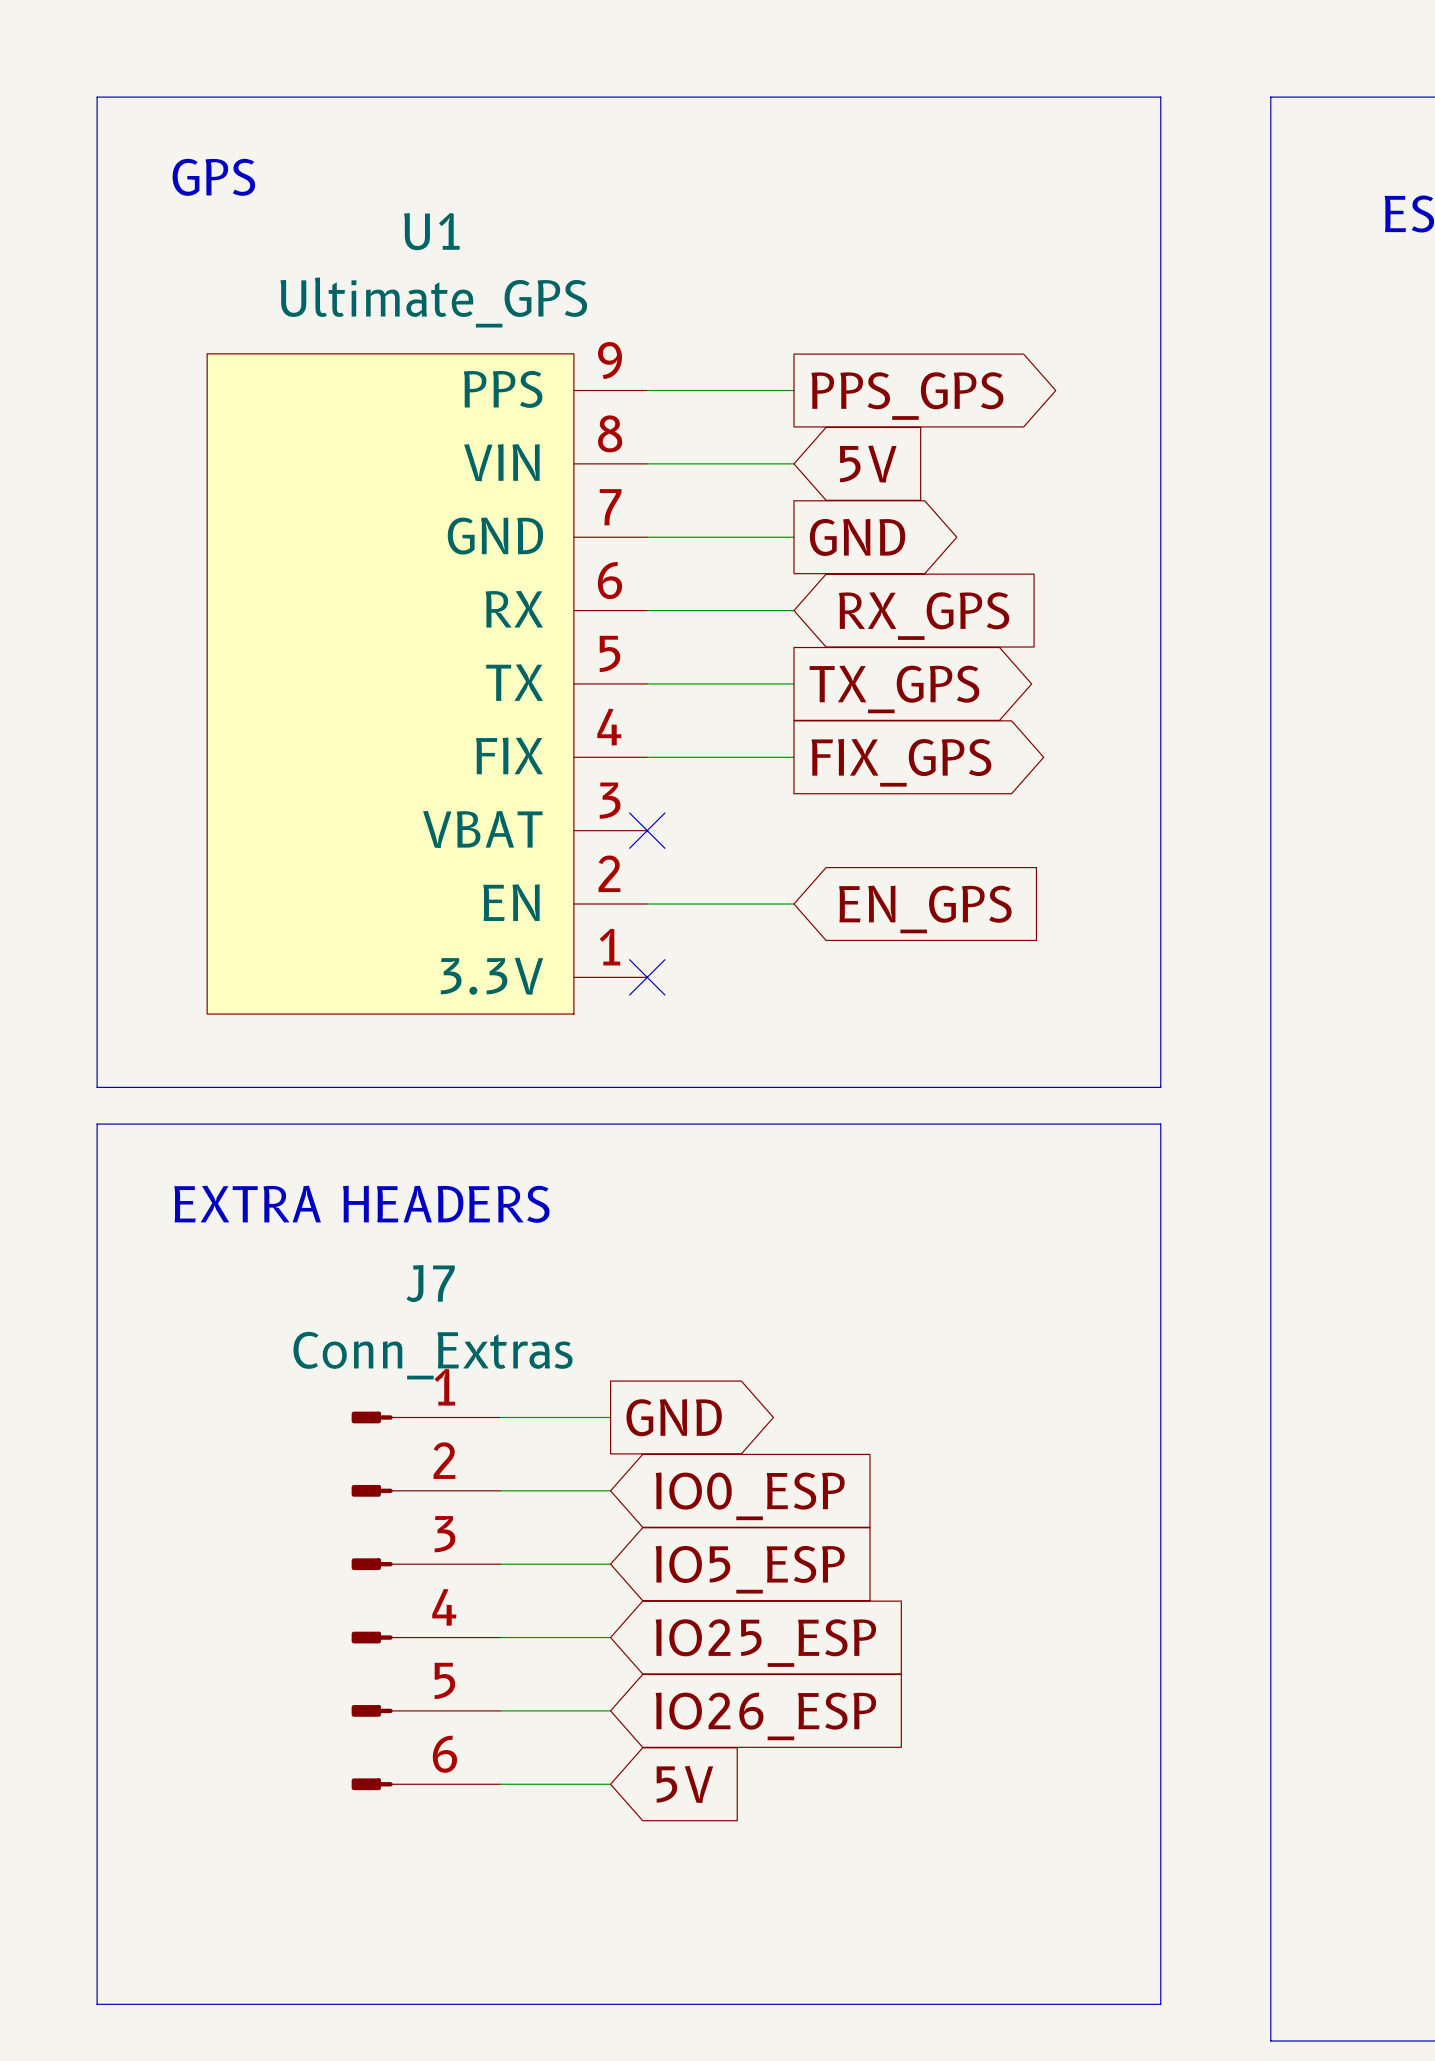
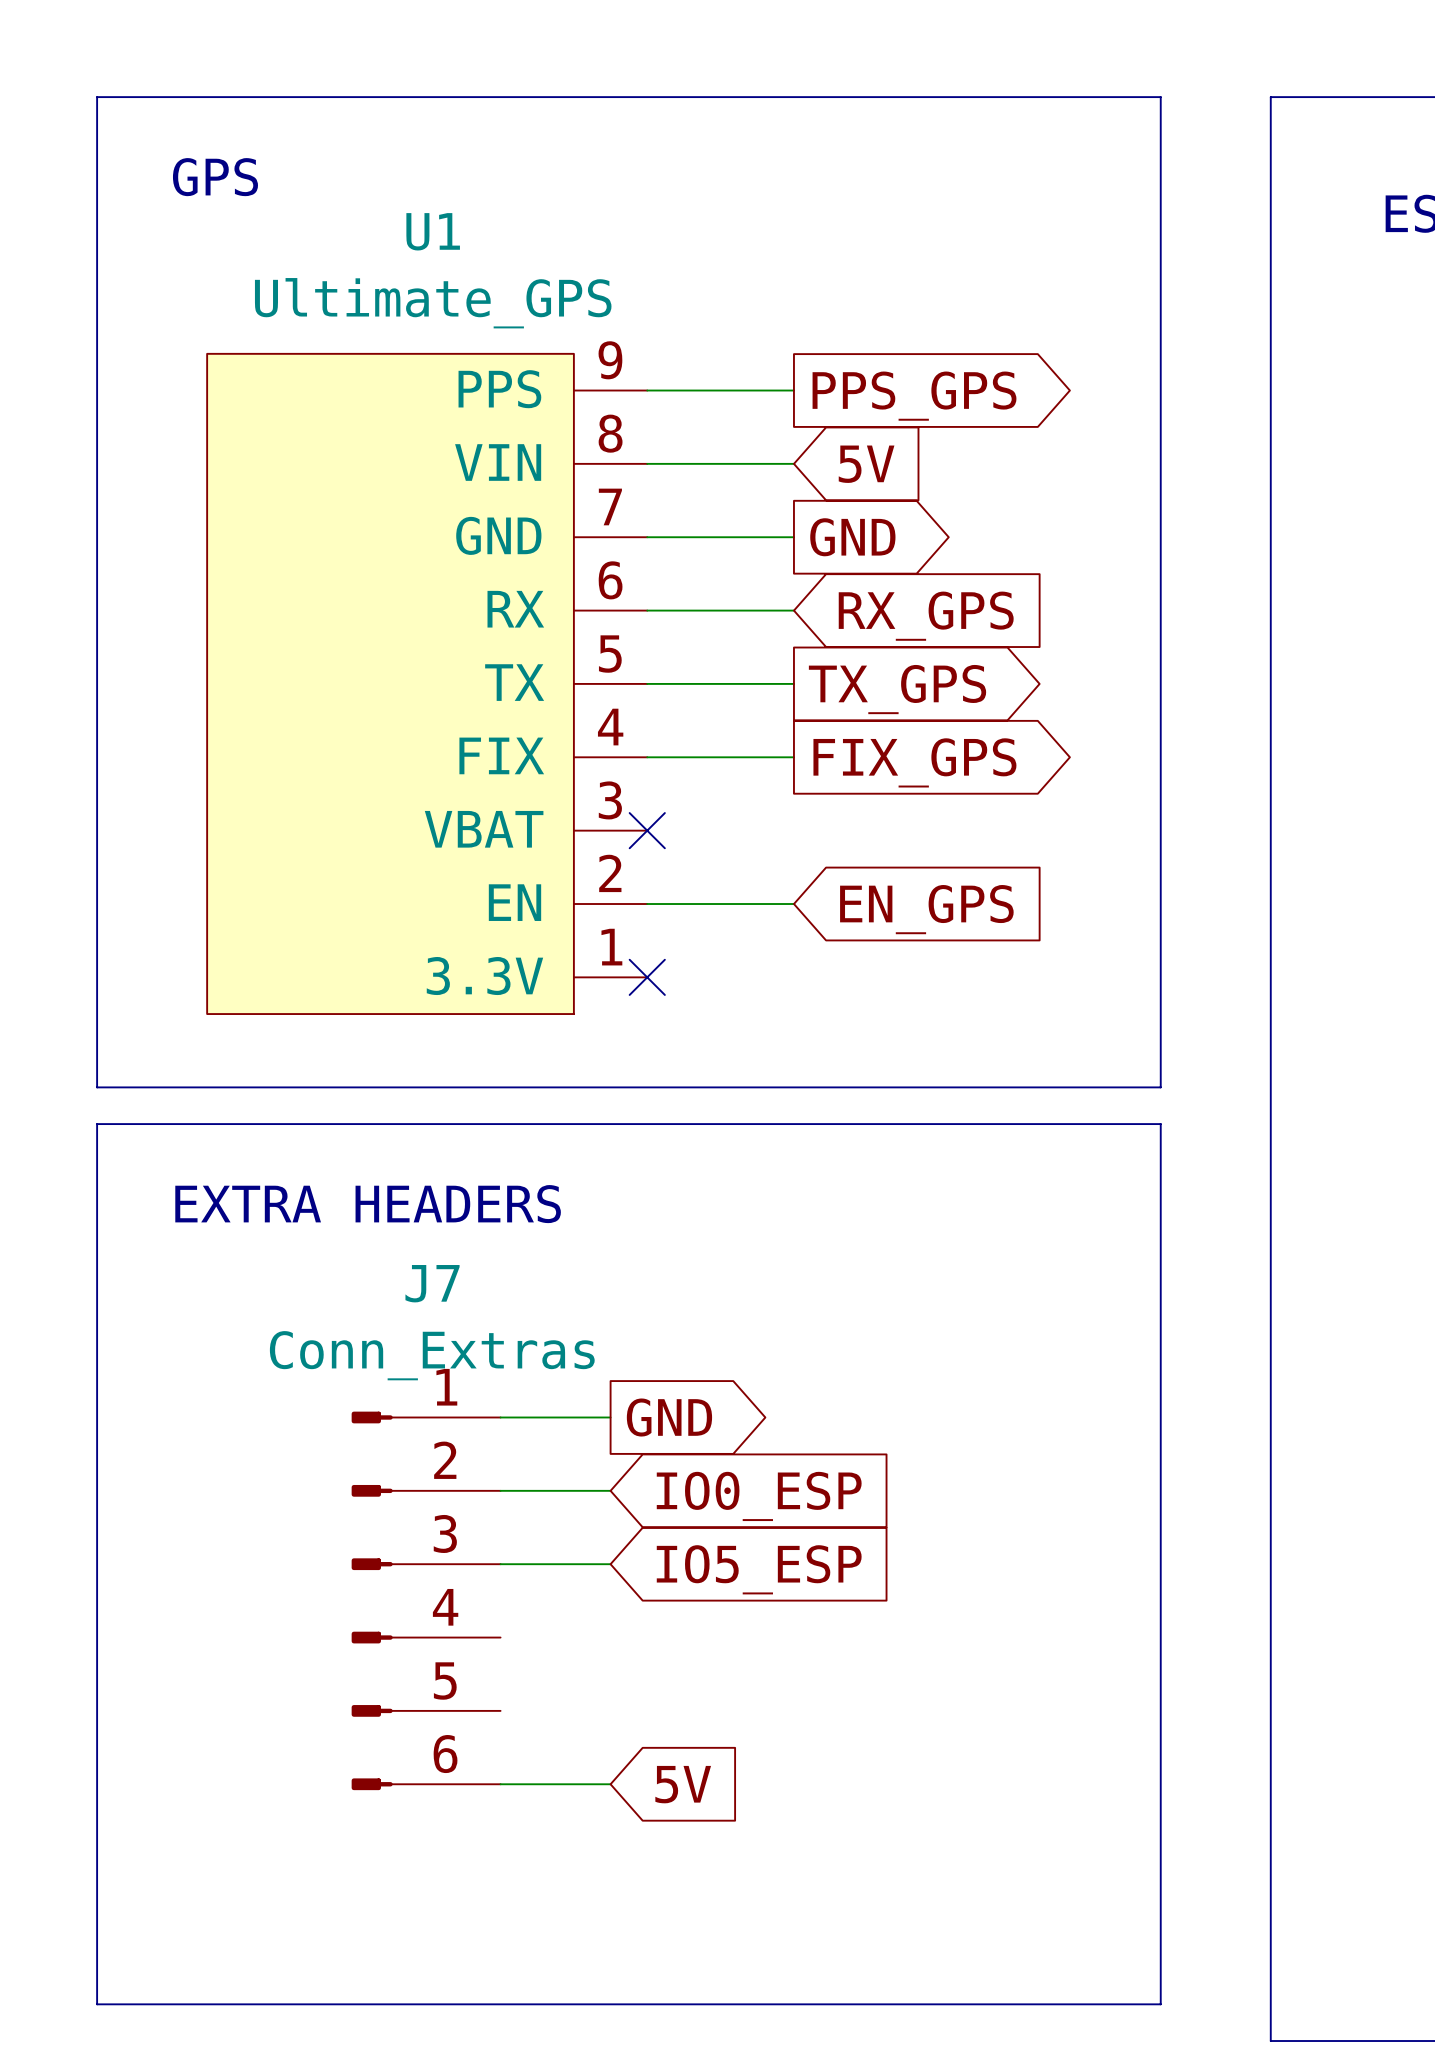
wire: (500, 1637) (610, 1637) -> none
global label: IO25_ESP (765, 1643) -> none
wire: (500, 1710) (610, 1710) -> none
global label: IO26_ESP (765, 1716) -> none

